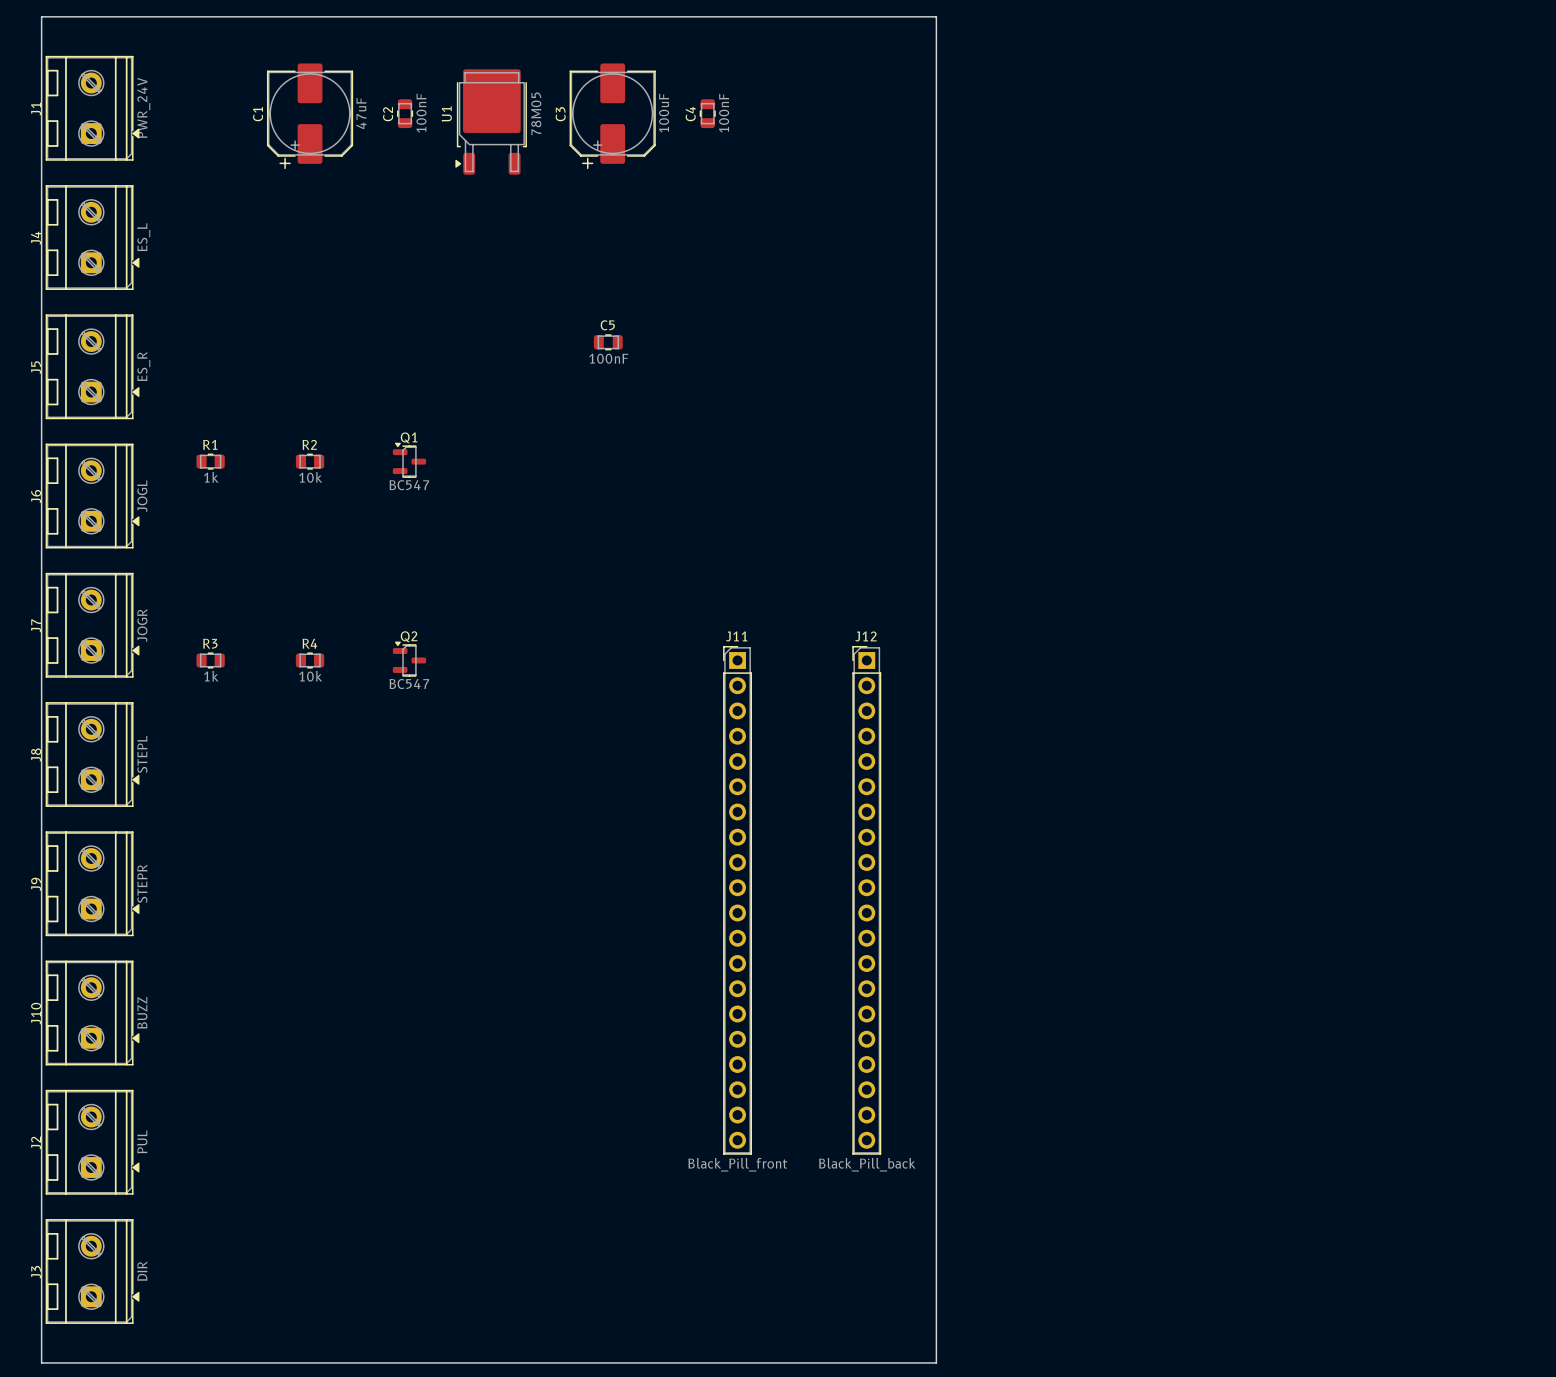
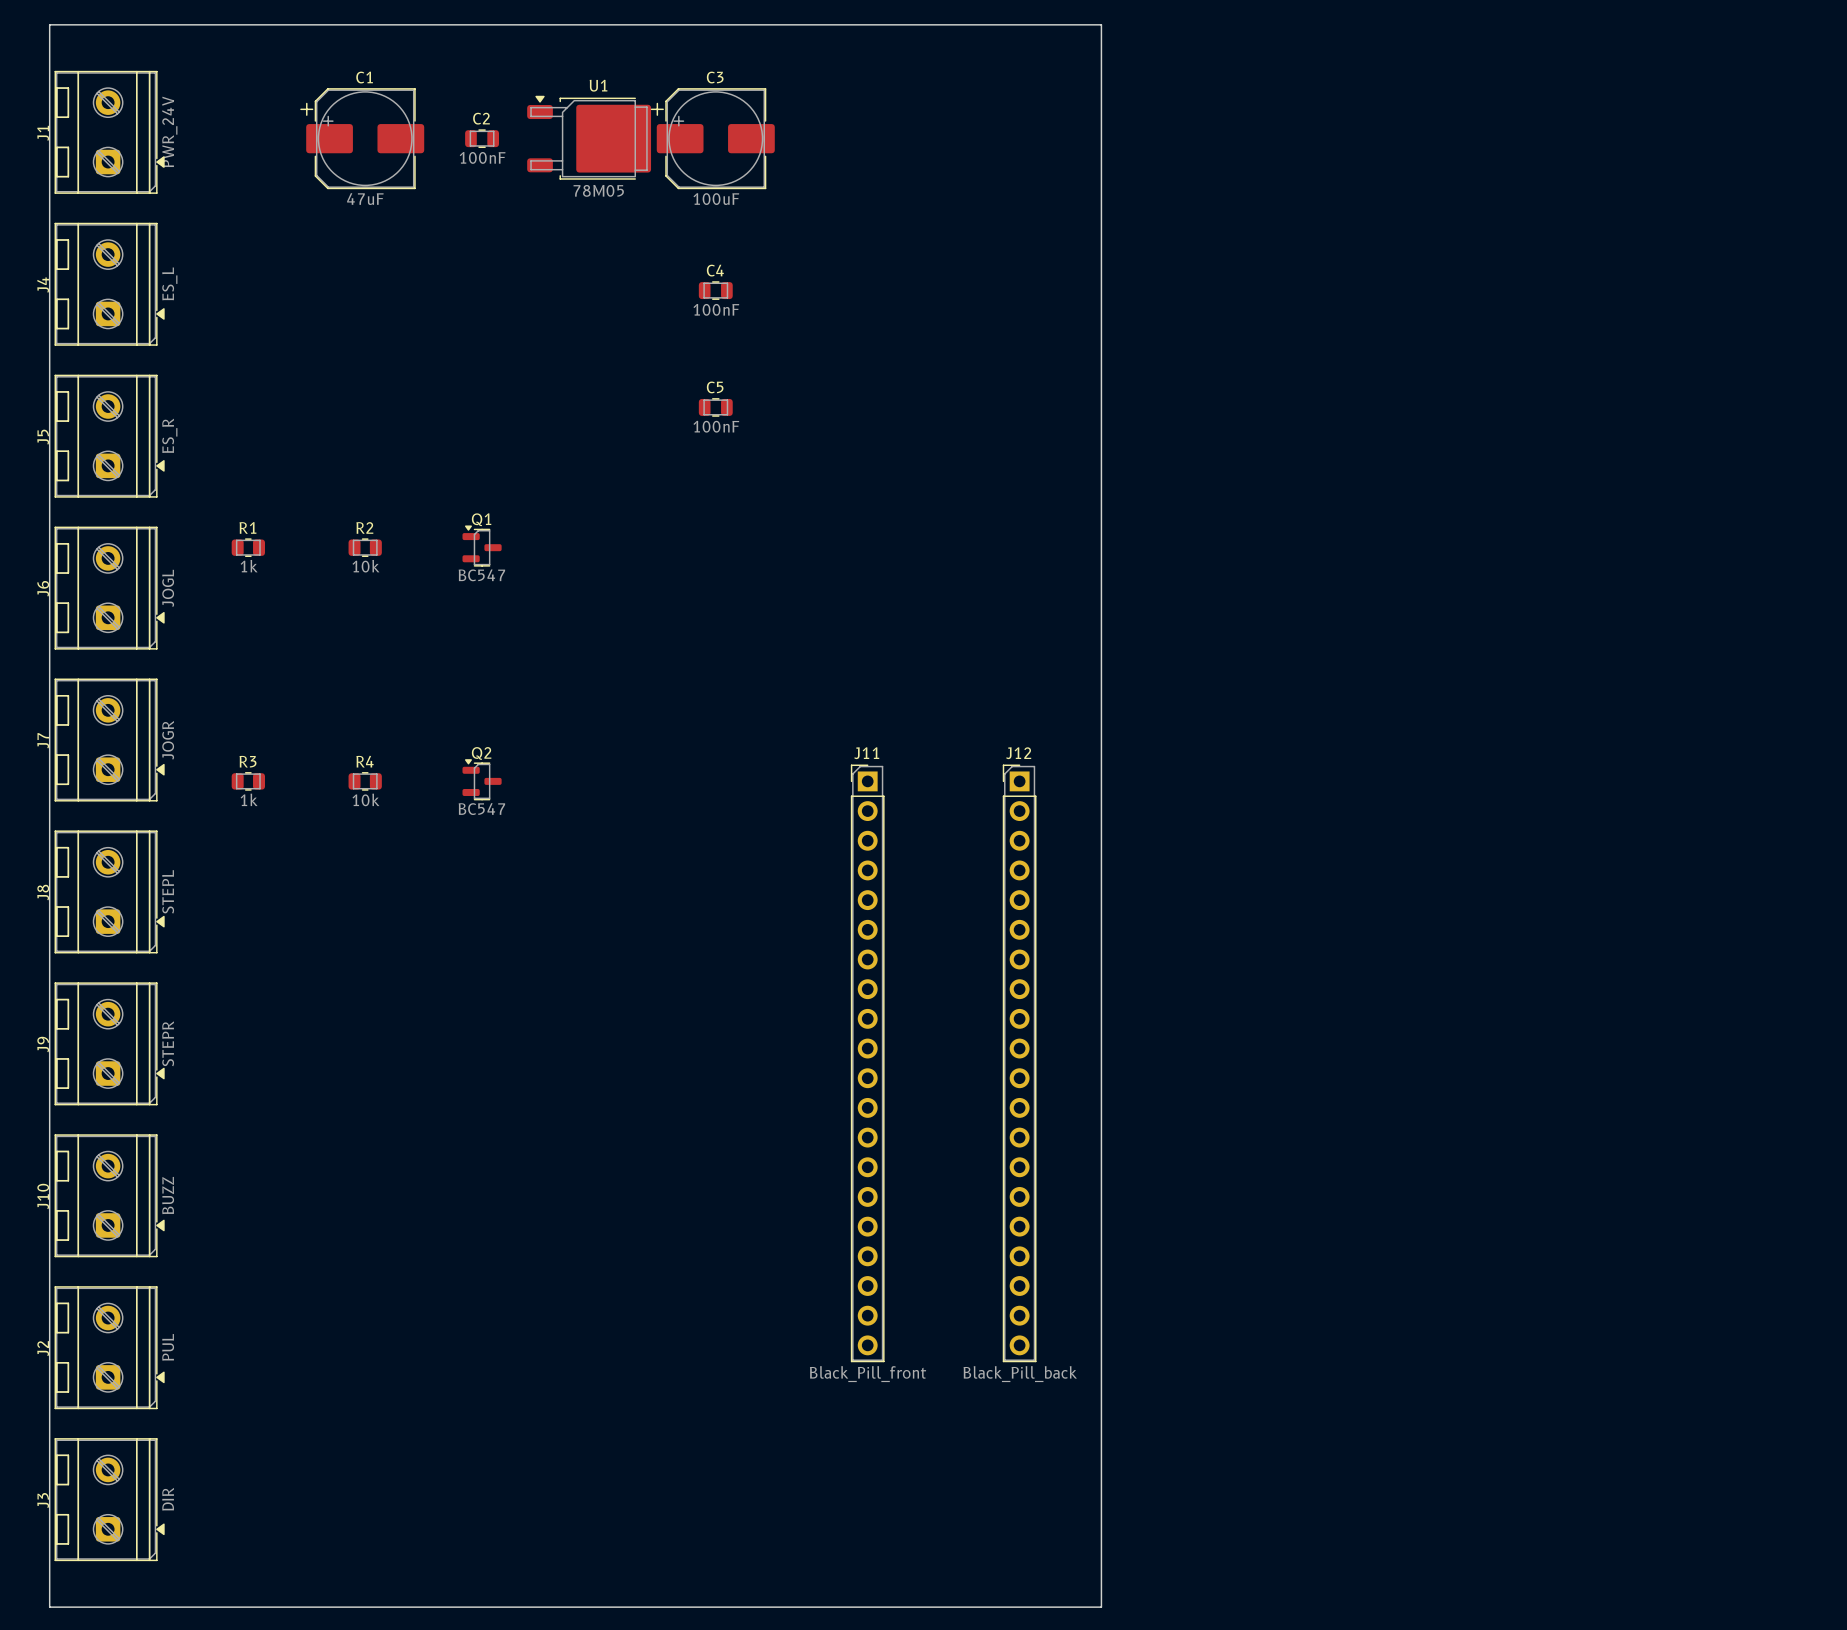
C2 rotation: 0° (405, 113) -> 90° clockwise (482, 138)
C4 rotation: 0° (707, 113) -> 90° clockwise (715, 290)
C4 position: (707, 113) -> (715, 290)
C1 rotation: 0° (310, 116) -> 90° clockwise (362, 138)
C3 rotation: 0° (612, 116) -> 90° clockwise (712, 138)
U1 rotation: 0° (491, 122) -> 90° clockwise (589, 137)

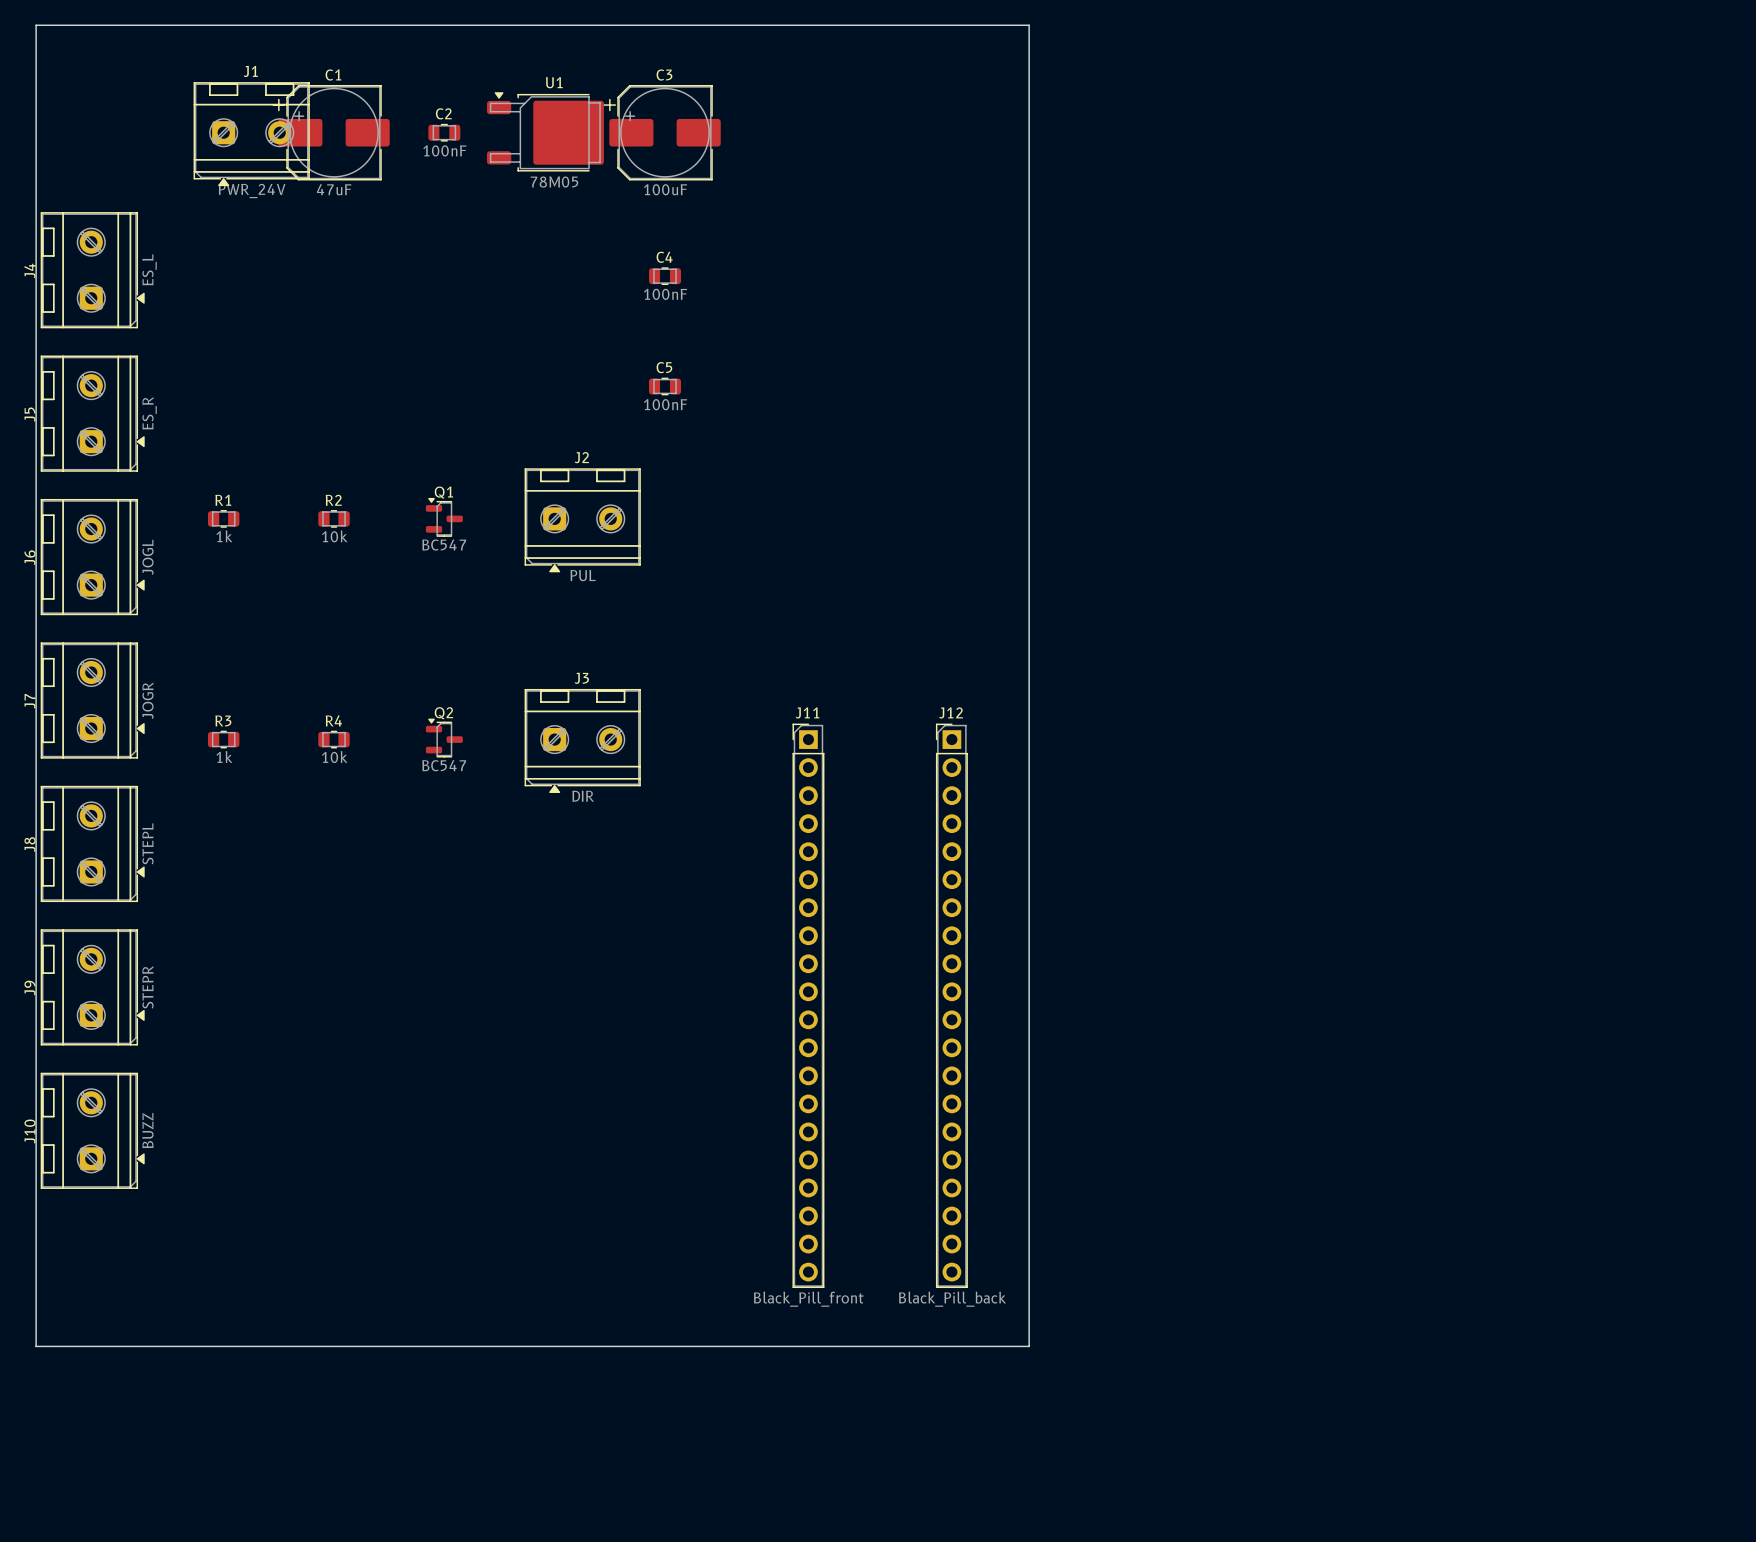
J1 rotation: 0° (109, 132) -> 90° clockwise (251, 134)
J1 position: (109, 132) -> (251, 134)
J2 rotation: 0° (109, 1347) -> 90° clockwise (582, 520)
J2 position: (109, 1347) -> (582, 520)
board edge: (49, 1424) (49, 1607) (1101, 1607) (1101, 1424) -> (36, 1346) (1029, 1346)
J3 rotation: 0° (109, 1499) -> 90° clockwise (582, 741)
J3 position: (109, 1499) -> (582, 741)

